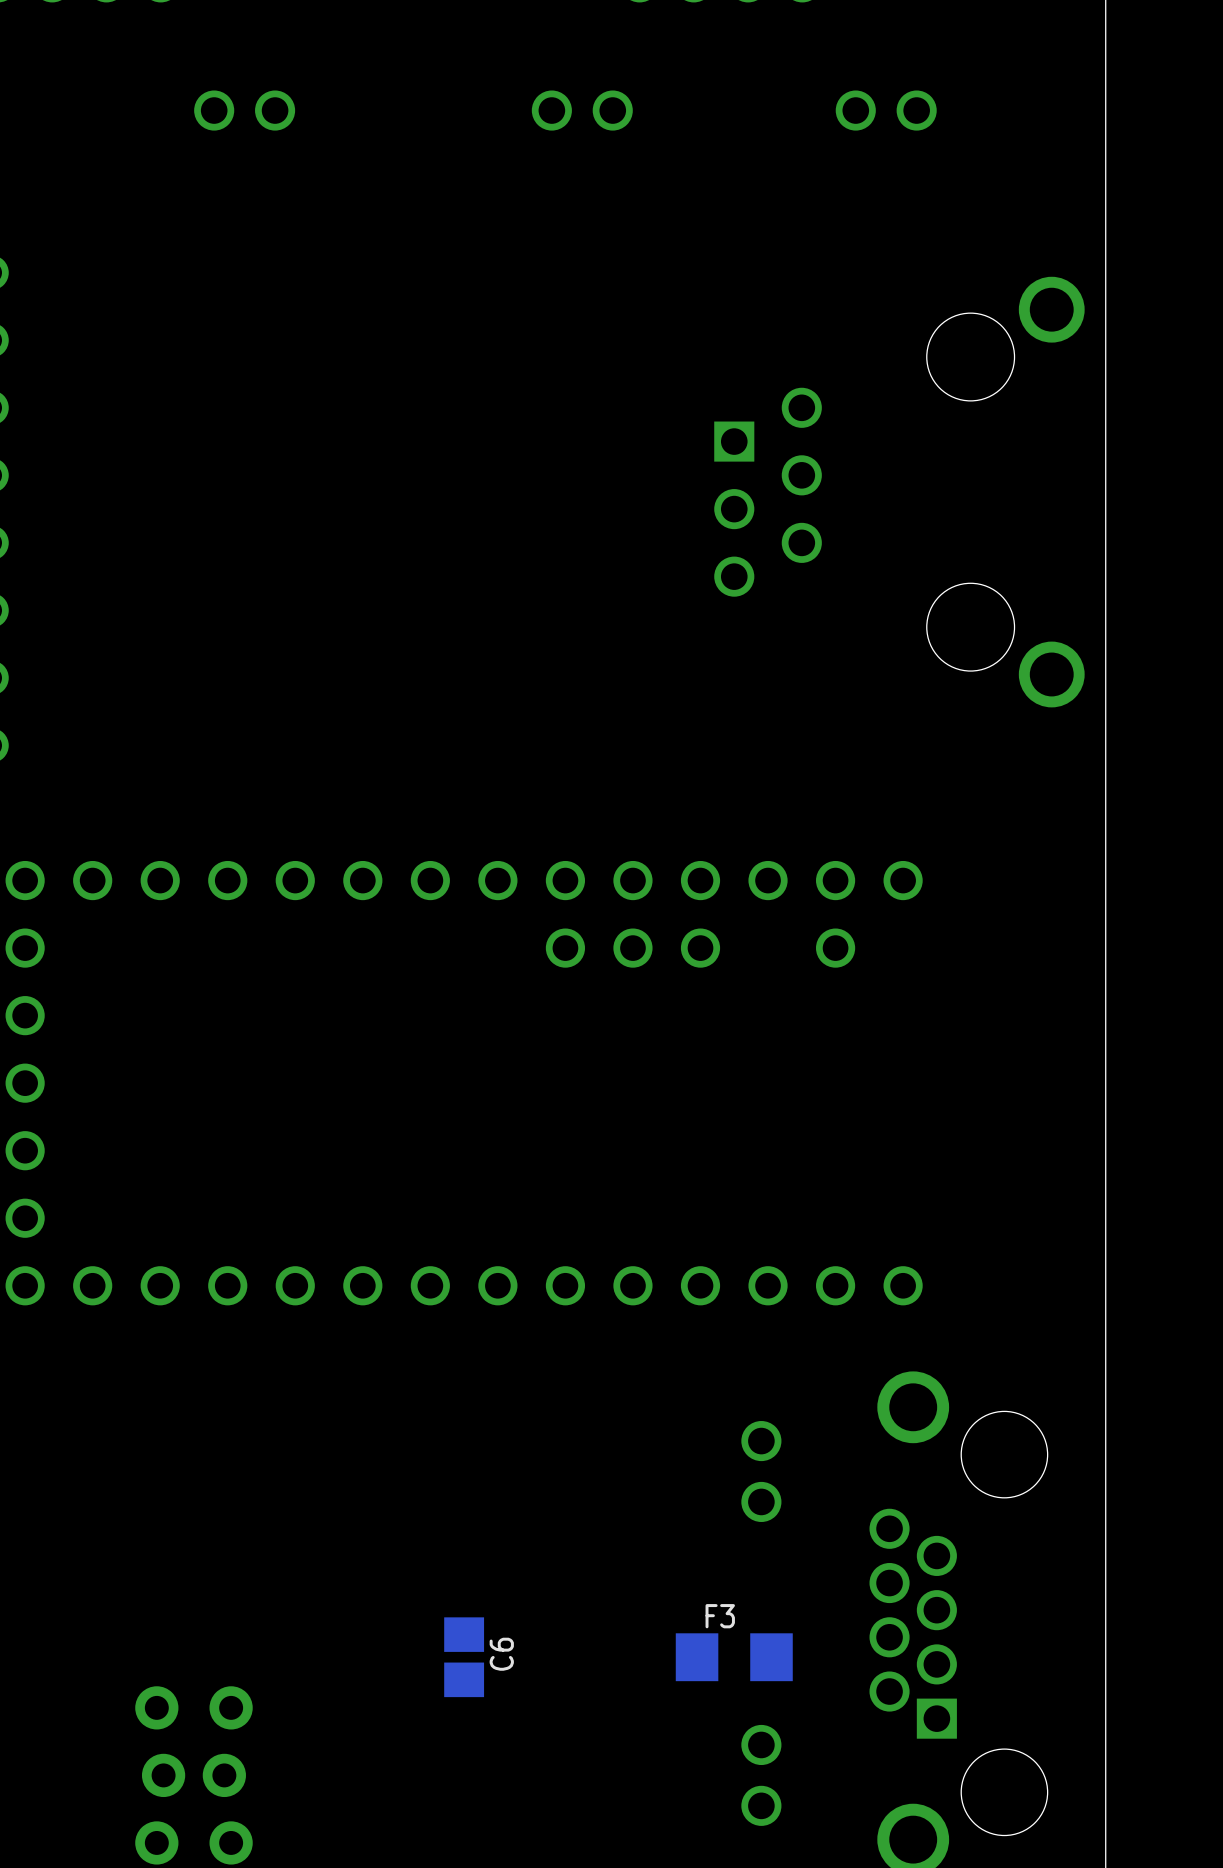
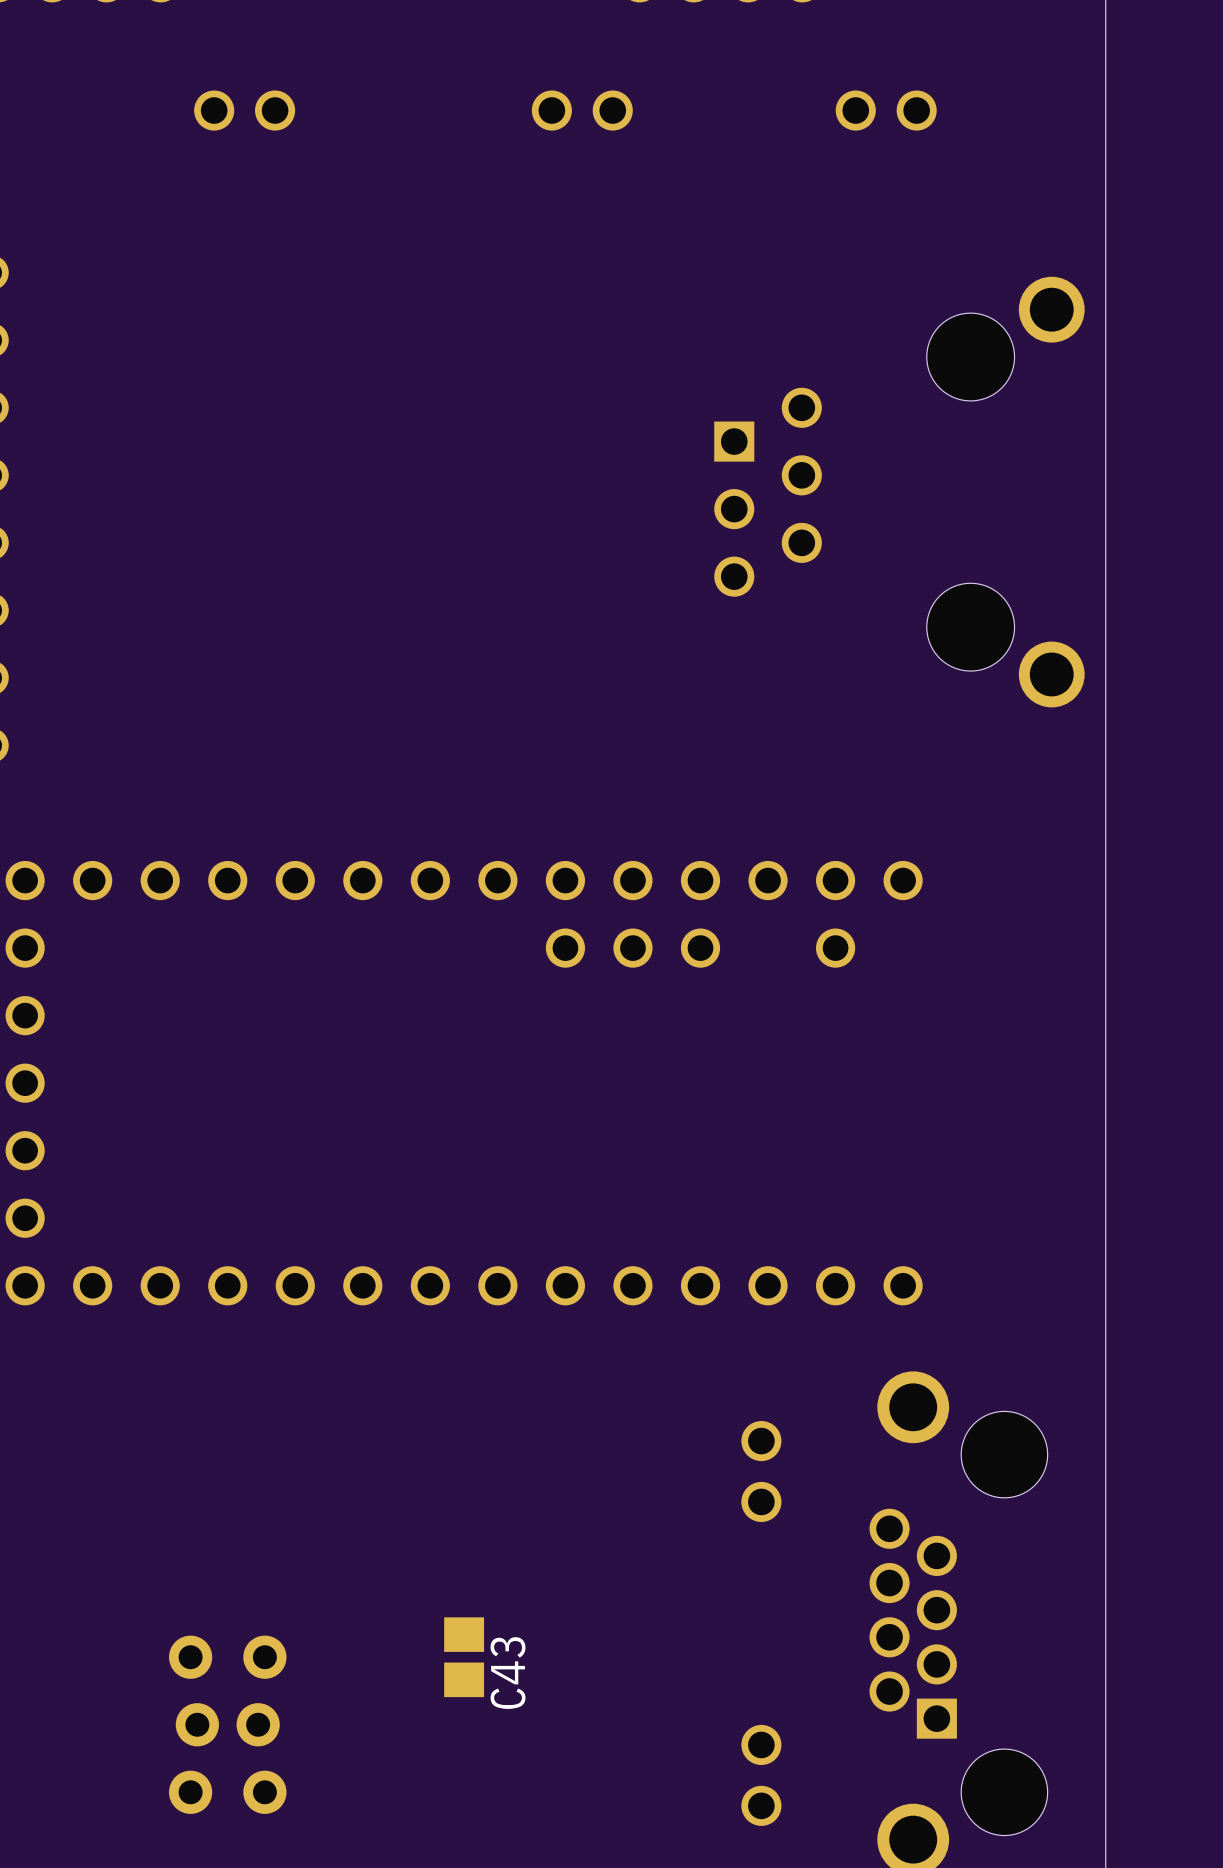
C6 name: C6 (501, 1654) -> C43 (508, 1673)
F3: (734, 1657) -> none
part position: (193, 1775) -> (227, 1724)

